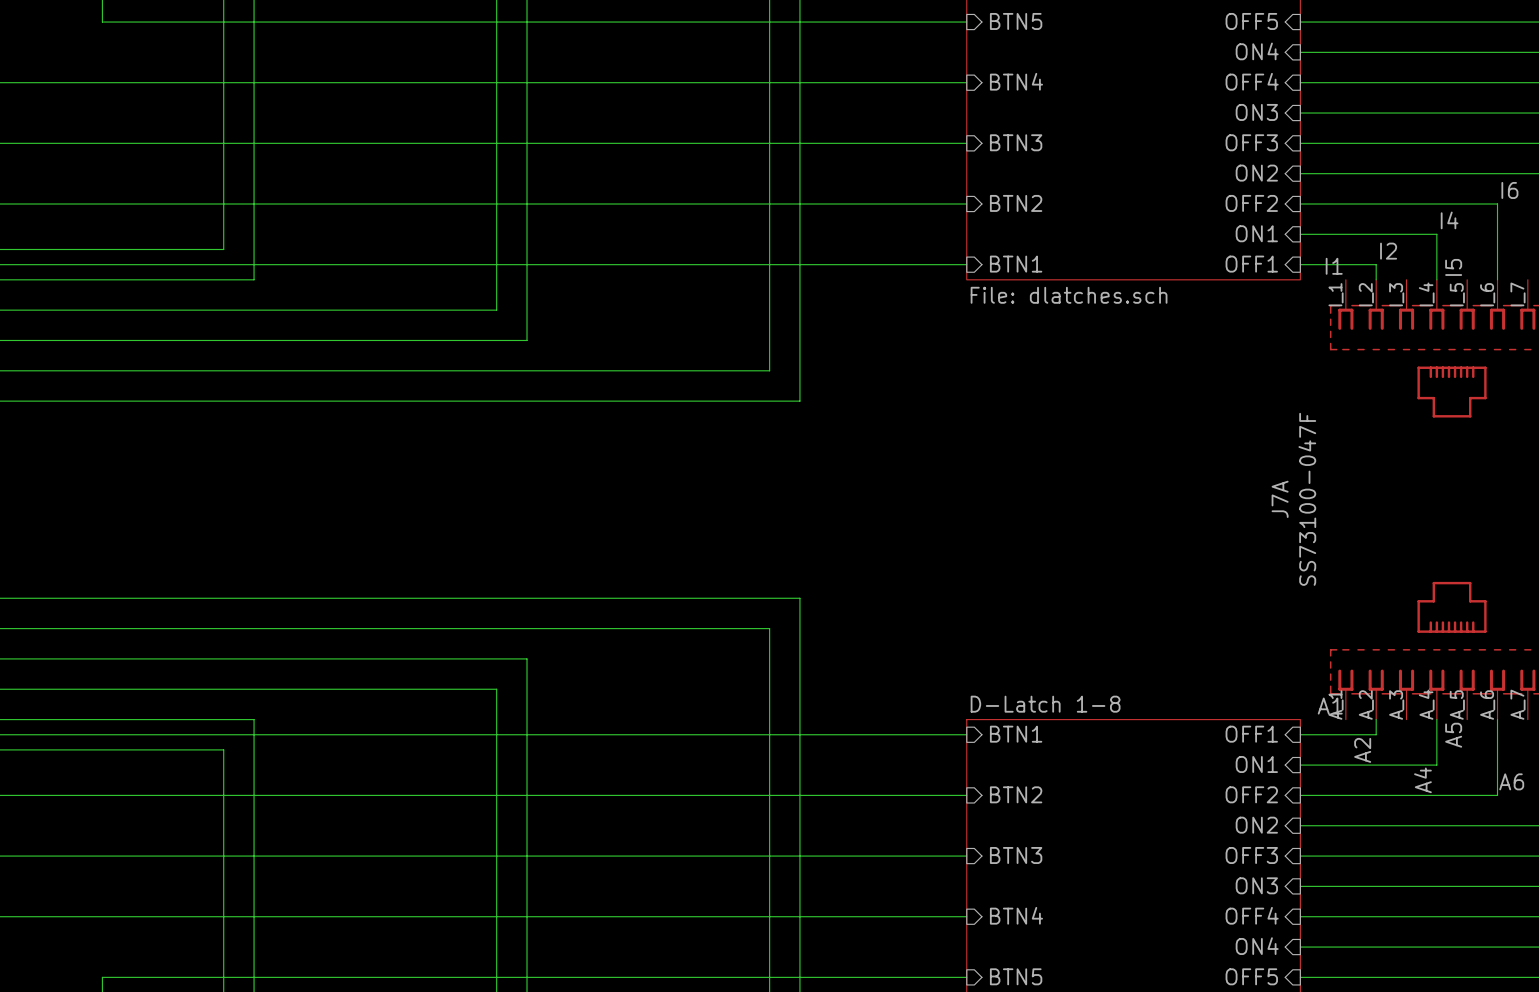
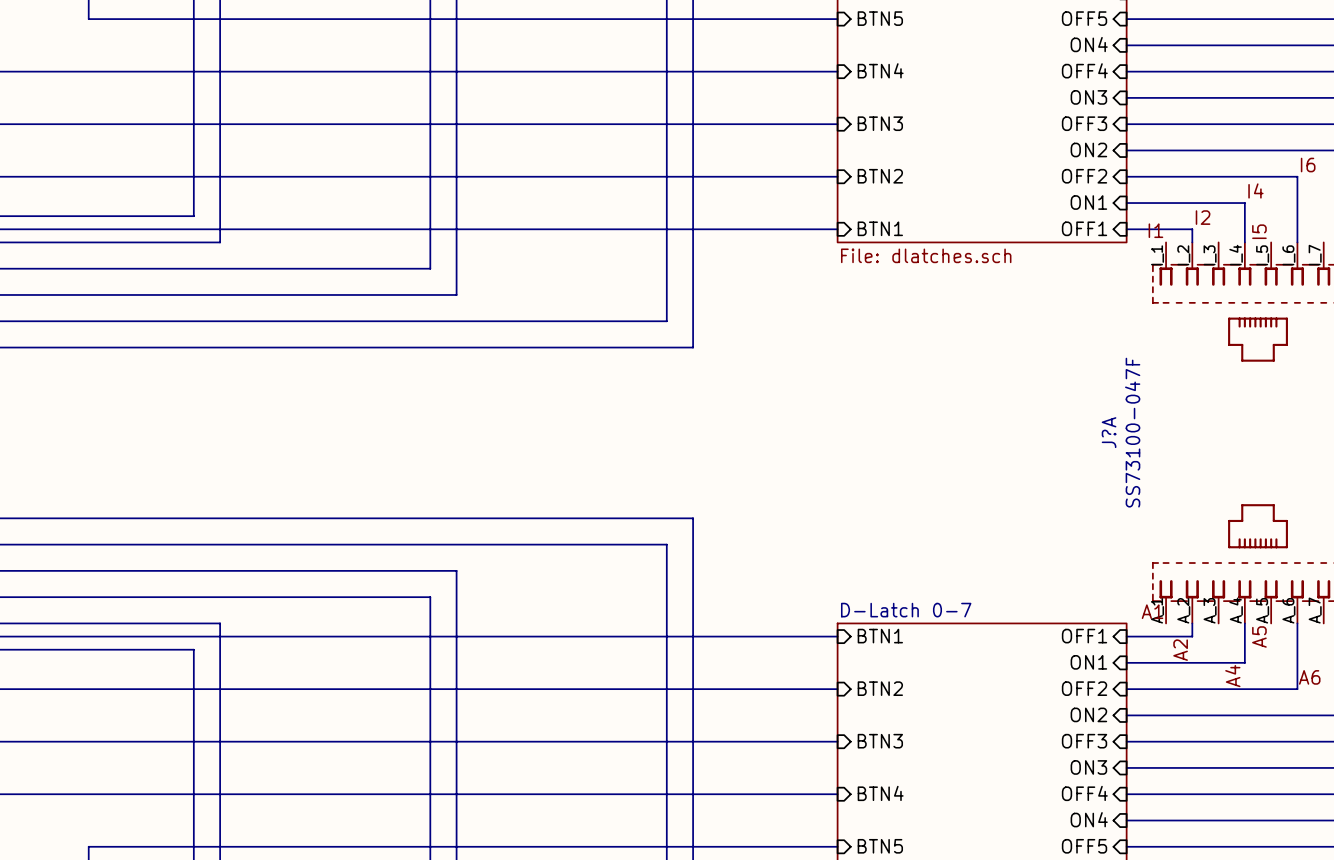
J7A name: J7A (1280, 499) -> J?A (1109, 432)
sheet D-Latch 1-8 name: D-Latch 1-8 (1045, 704) -> D-Latch 0-7 (906, 610)

